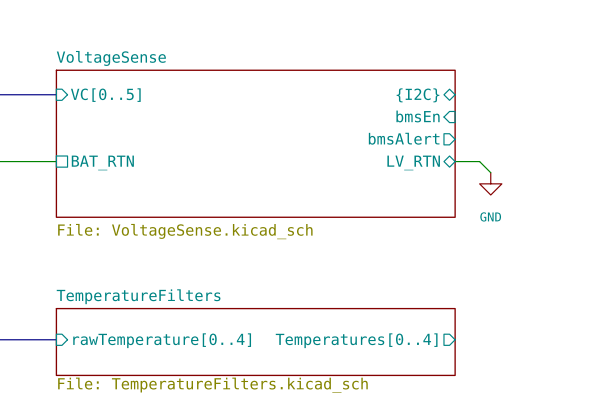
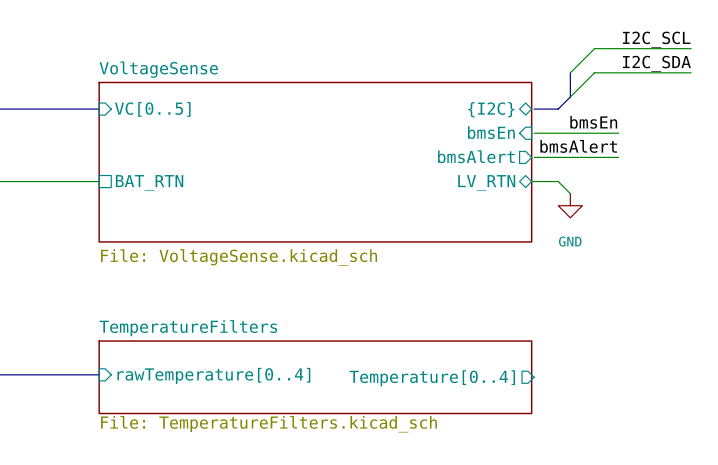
label: none -> I2C_SCL (656, 39)
wire: none -> (691, 48) (594, 48) (570, 72)
label: none -> I2C_SDA (656, 63)
bus: none -> (570, 72) (570, 96) (558, 109) (534, 109)
wire: none -> (691, 72) (594, 72) (570, 96)
label: none -> bmsEn (593, 122)
wire: none -> (534, 133) (618, 133)
label: none -> bmsAlert (578, 146)
wire: none -> (534, 157) (618, 157)
sheet pin: Temperatures[0..4] (356, 340) -> Temperature[0..4] (432, 378)

